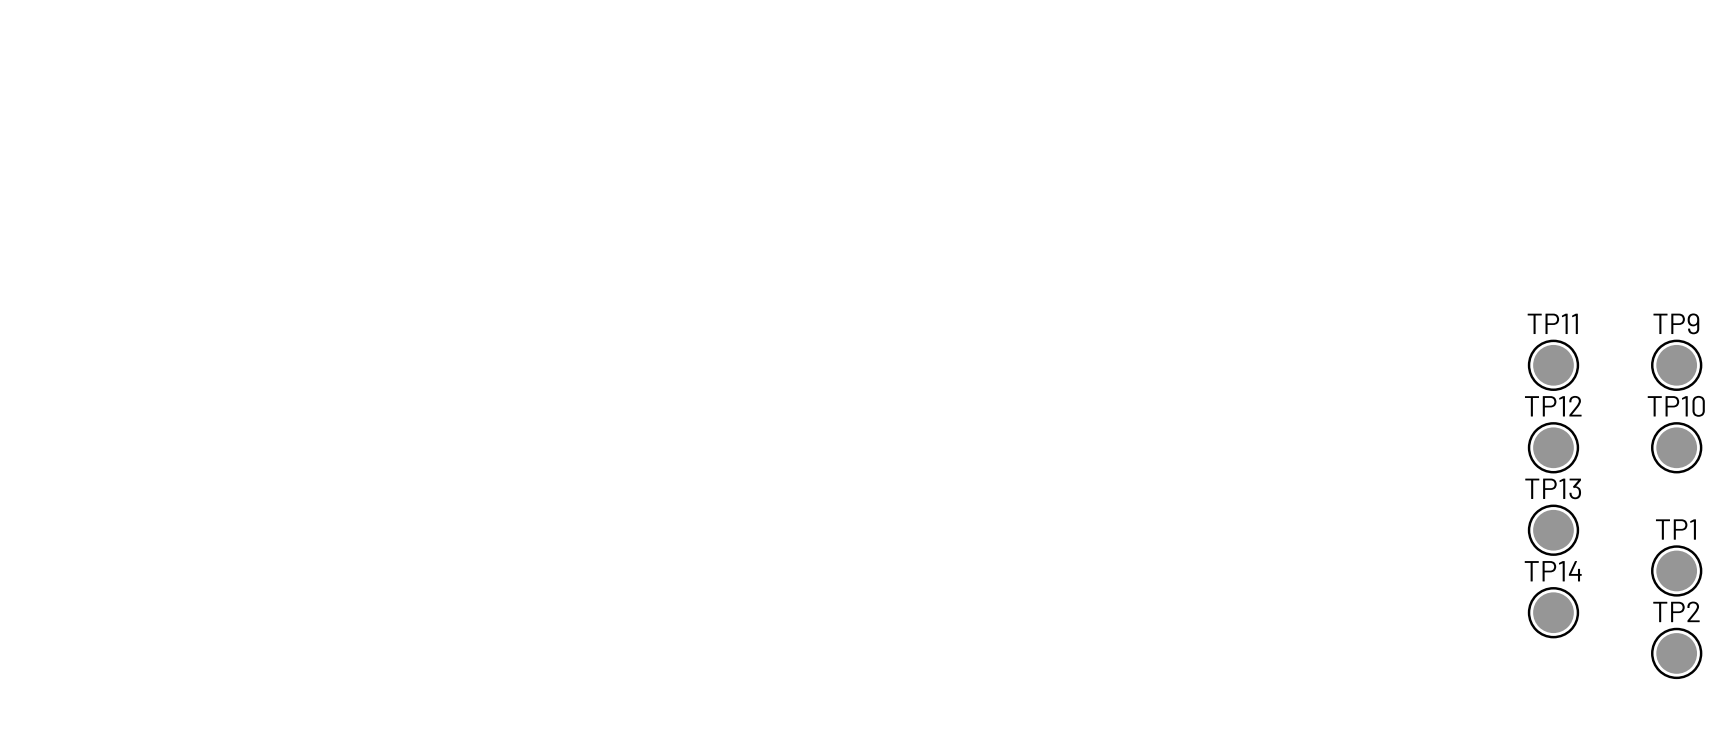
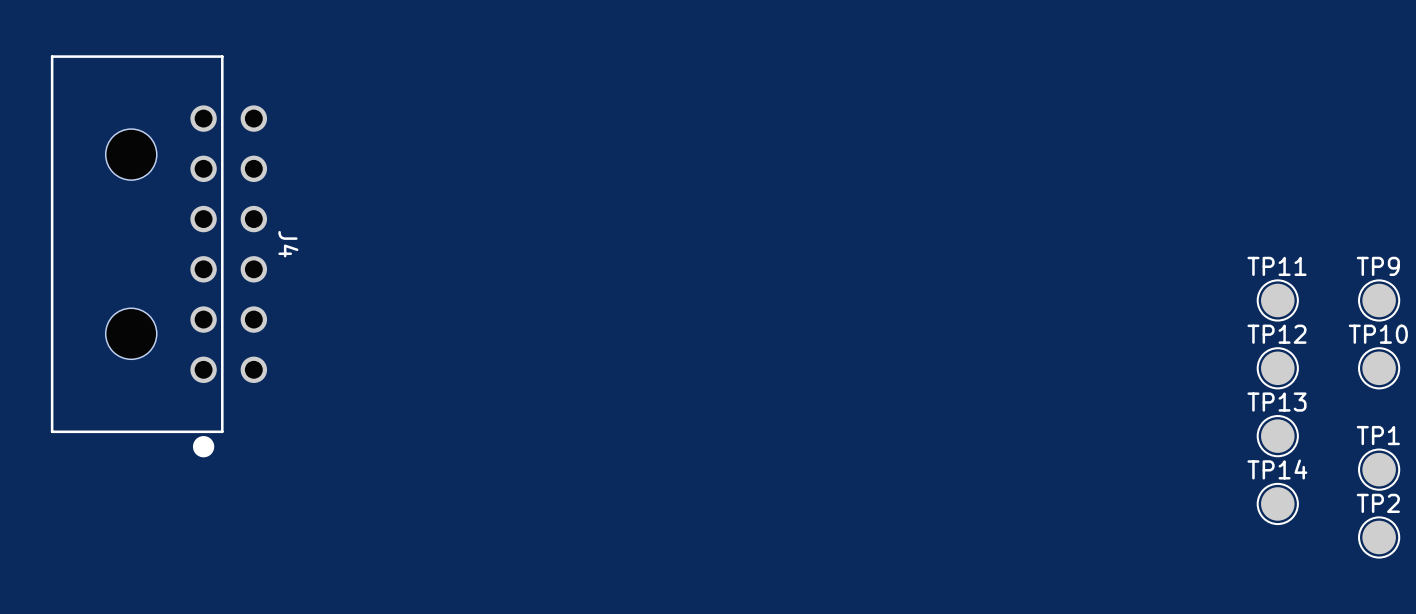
J4: none -> (158, 256)

